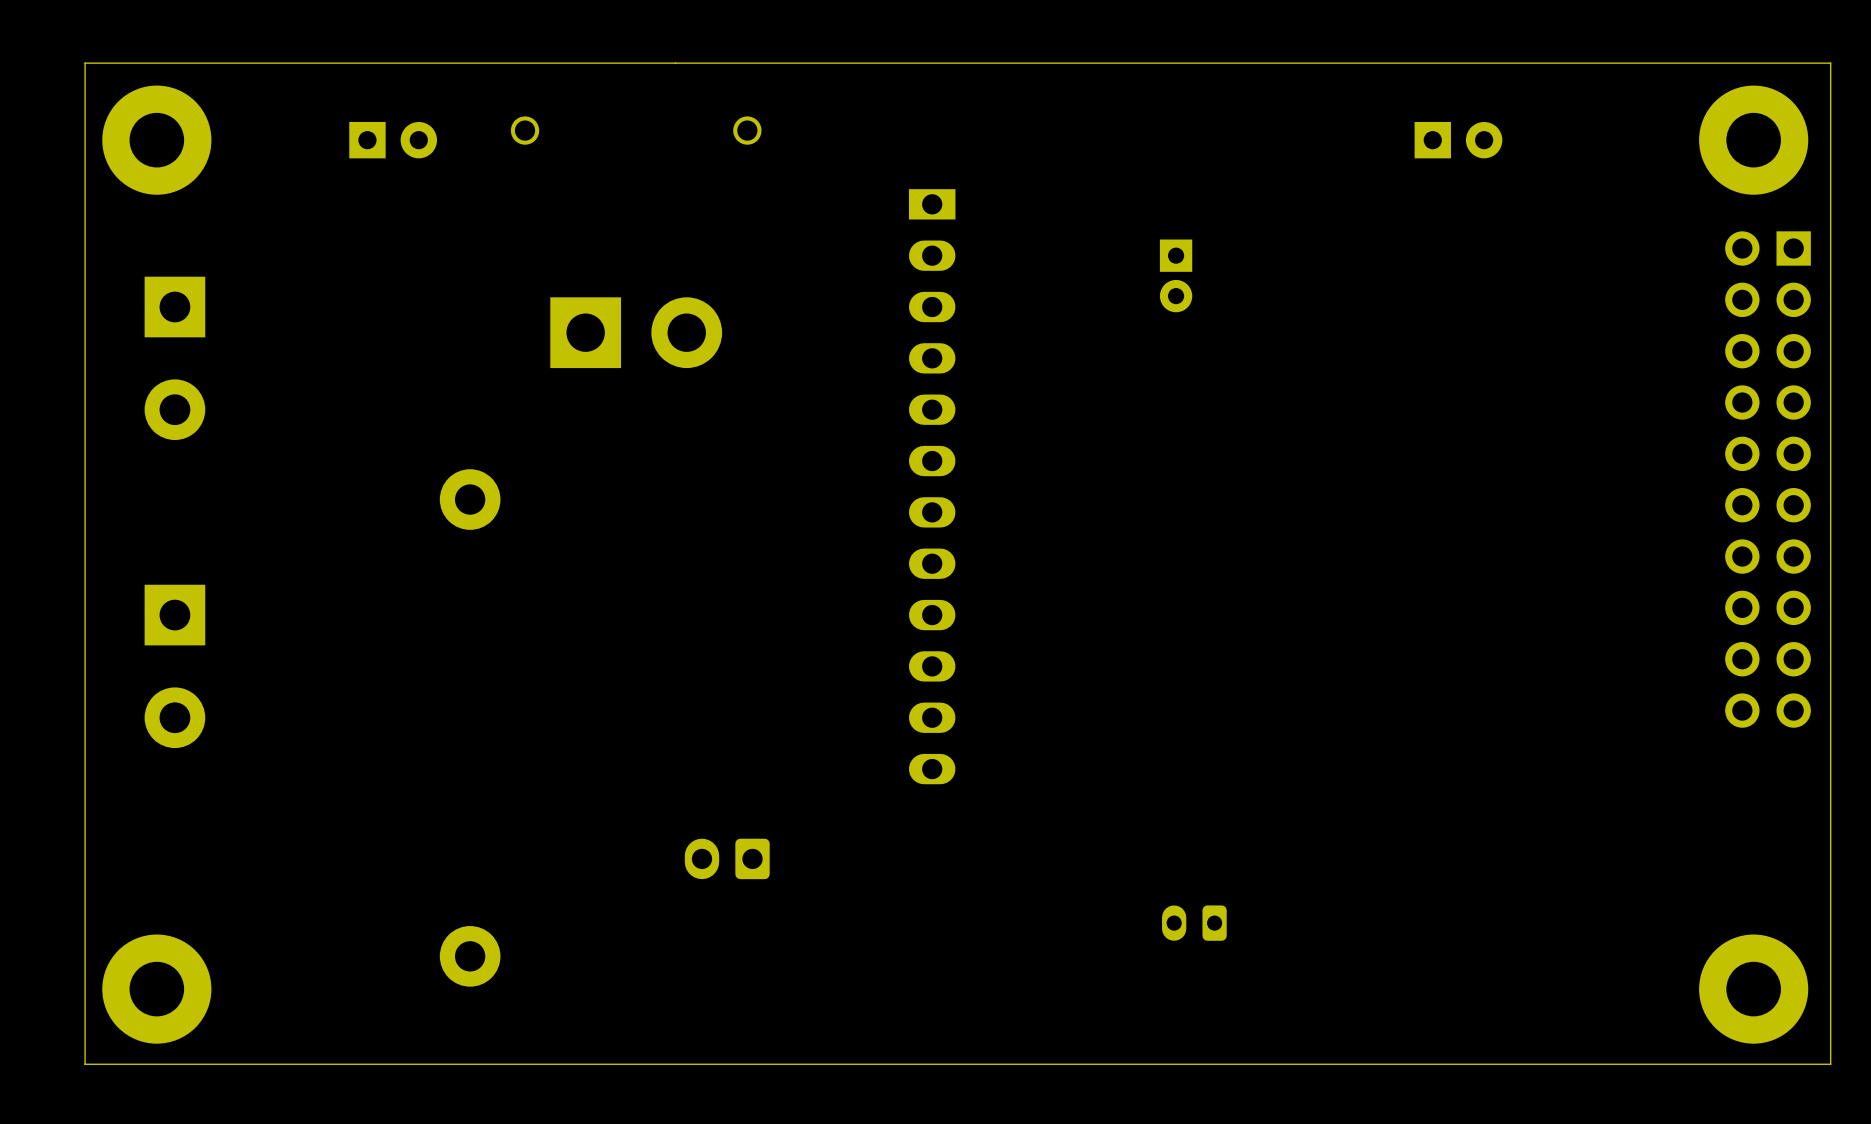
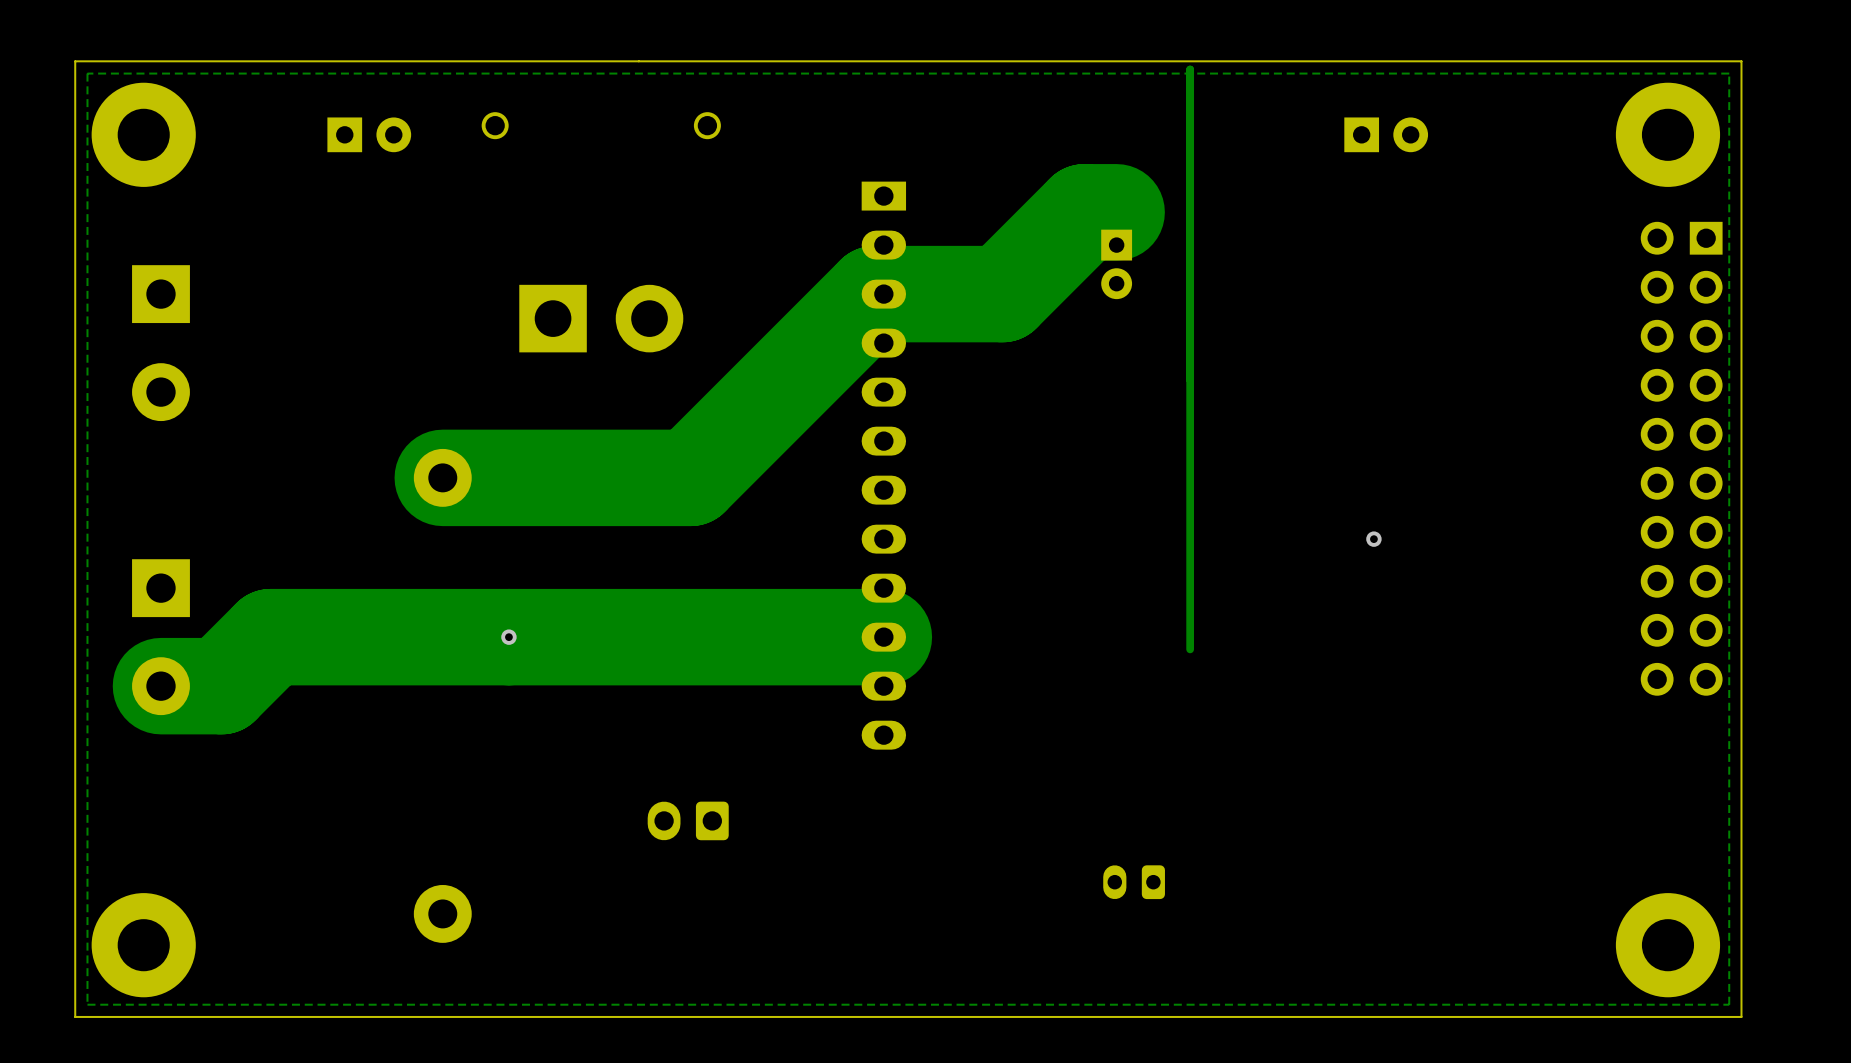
track: none -> (1190, 69) (1190, 649)
zone outline: none -> (1729, 73) (1729, 1004) (87, 1004) (87, 73) (1729, 73)
track: none -> (1116, 212) (1084, 212) (1002, 294) (874, 294) (690, 477) (442, 477)
via: none -> (1373, 539)
via: none -> (508, 637)
track: none -> (883, 637) (270, 637) (221, 686) (160, 686)

